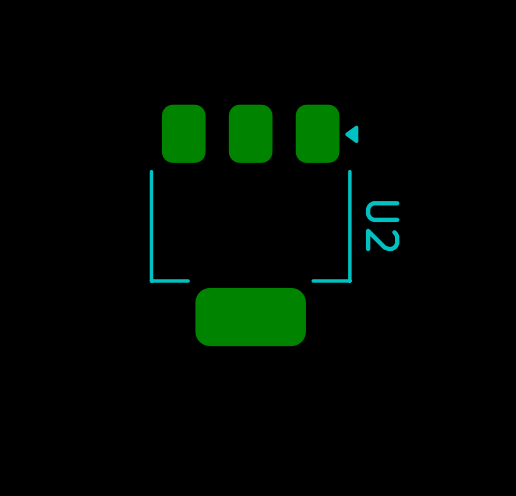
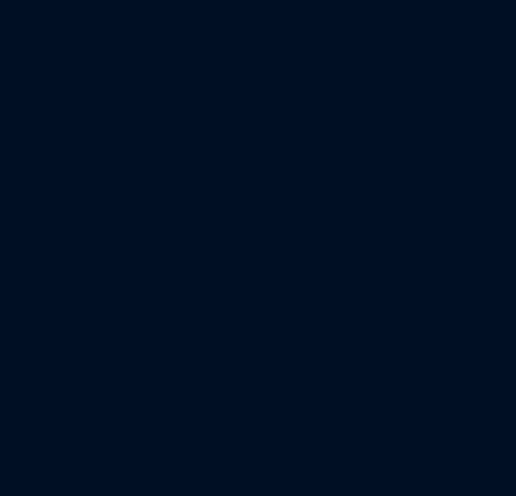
U2: (254, 225) -> none

